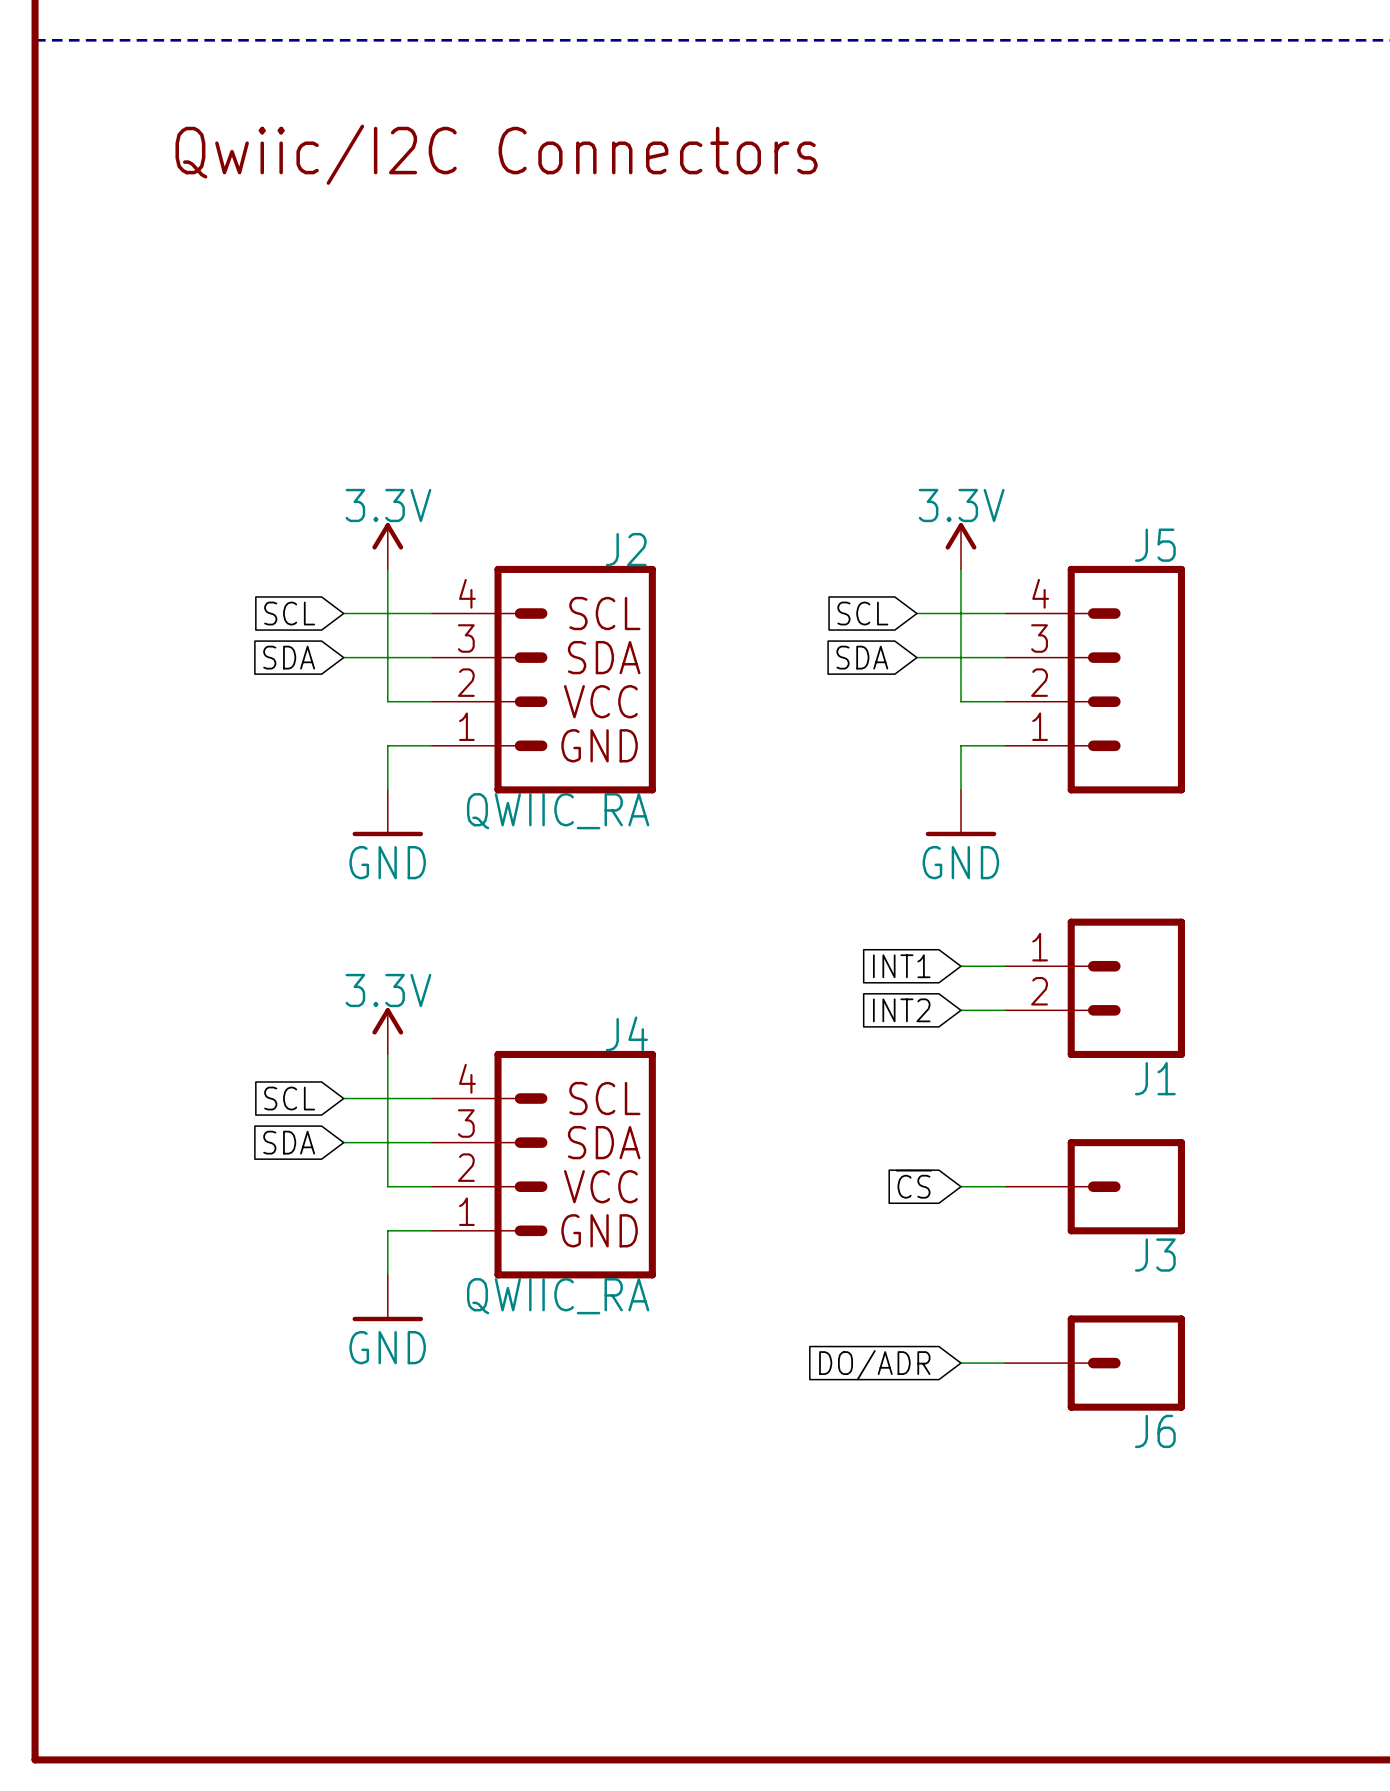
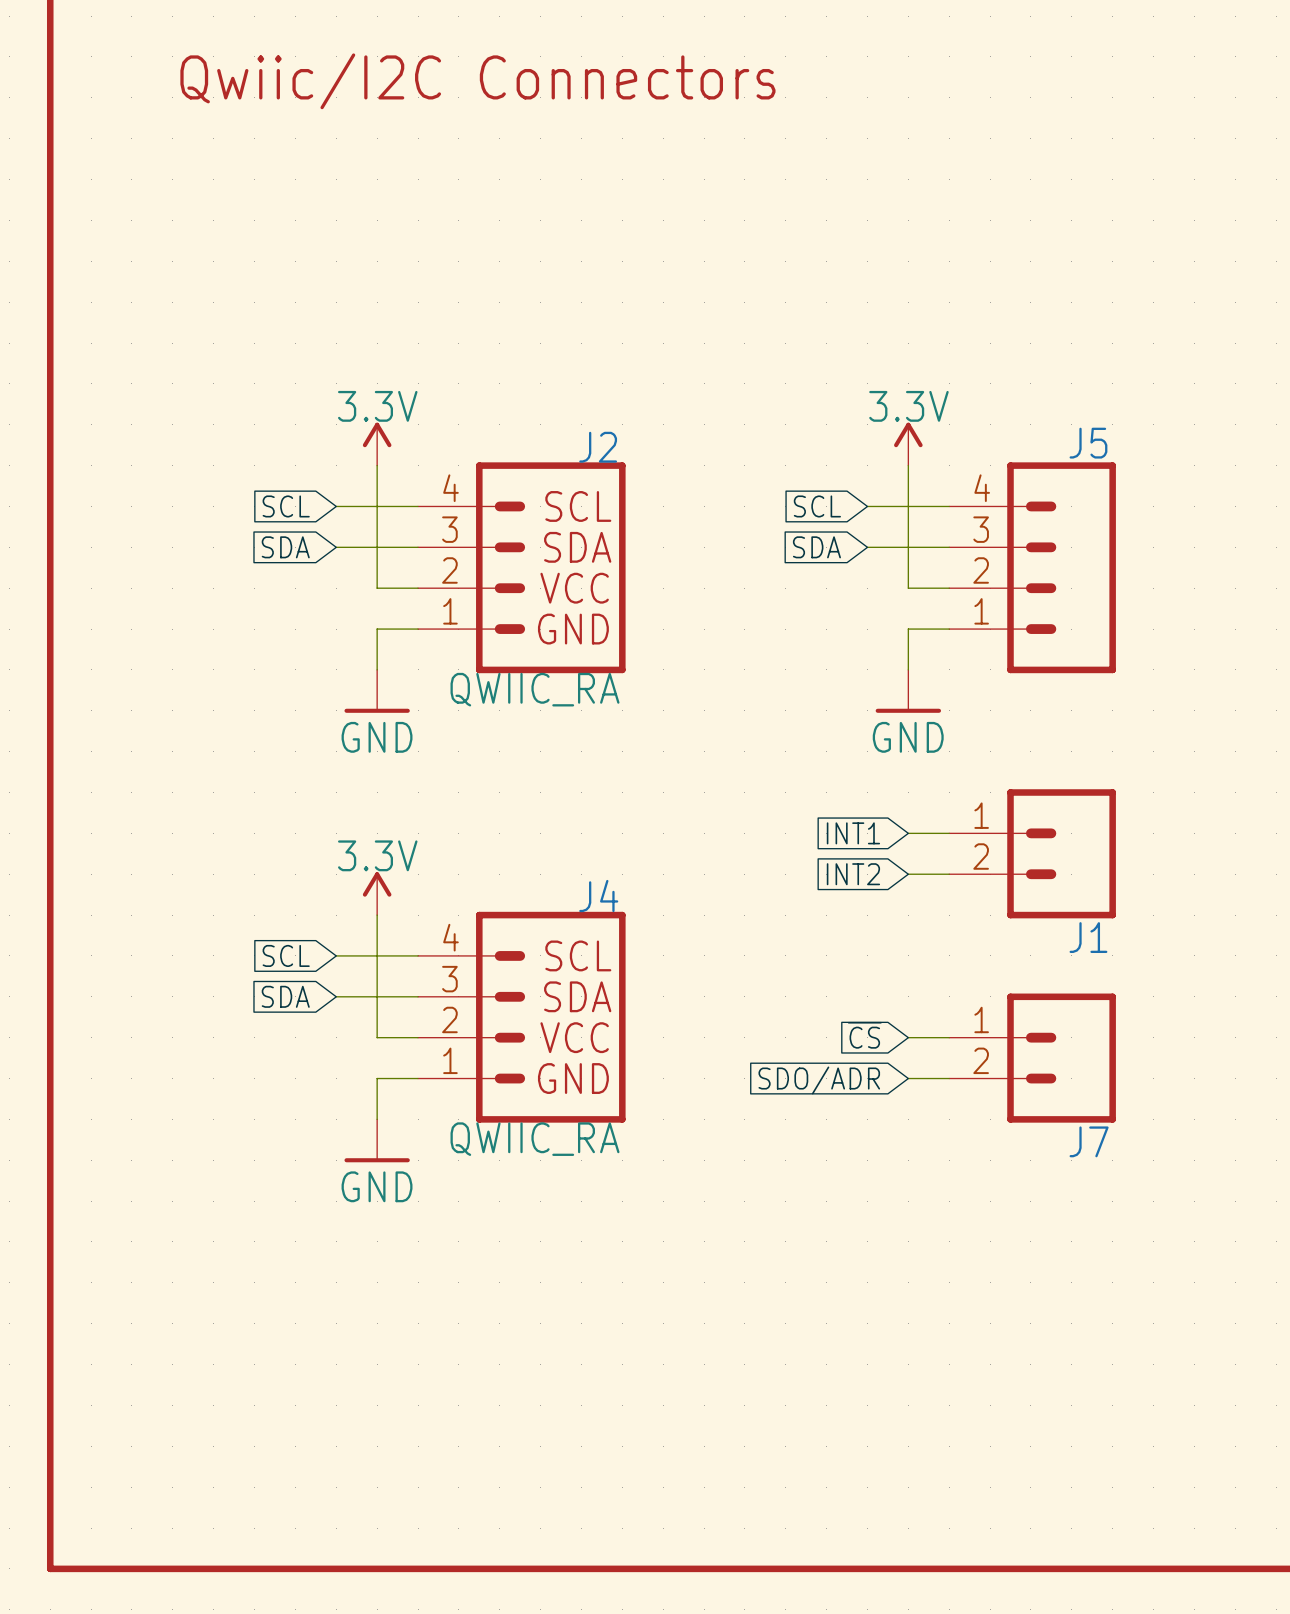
J3: (1095, 1186) -> none
J7: none -> (1032, 1058)
global label: none -> SDO/ADR (819, 1080)
wire: (960, 1363) (1005, 1363) -> (908, 1078) (949, 1078)
J6: (1095, 1363) -> none
global label: DO/ADR (874, 1365) -> none

